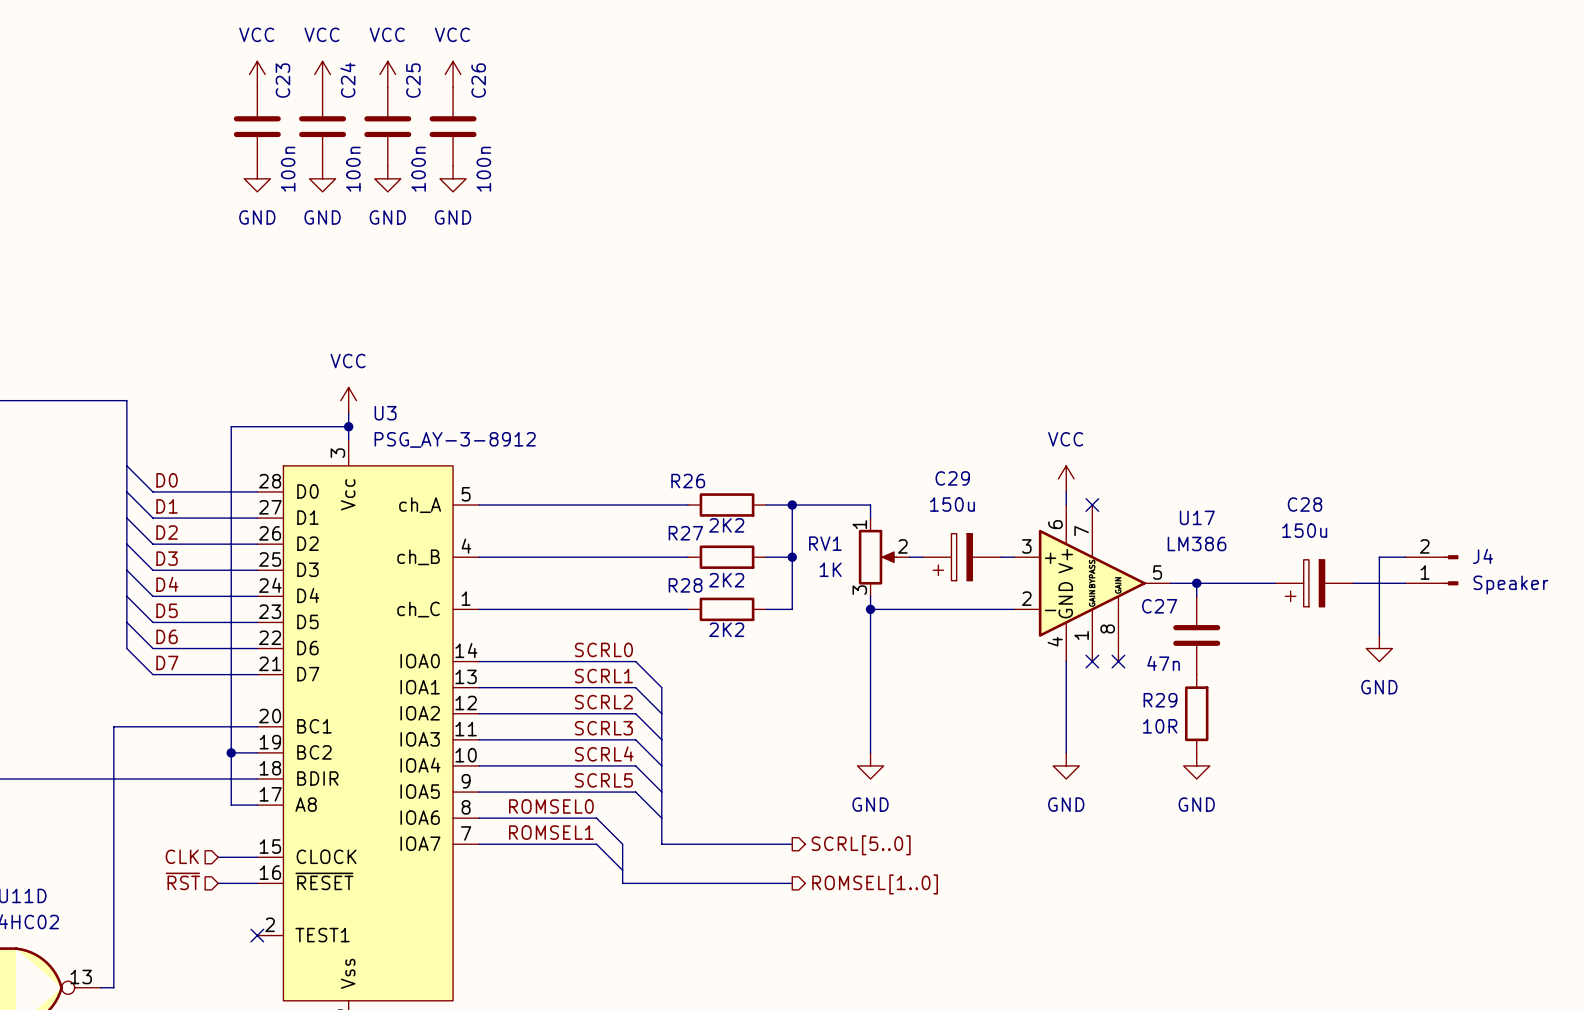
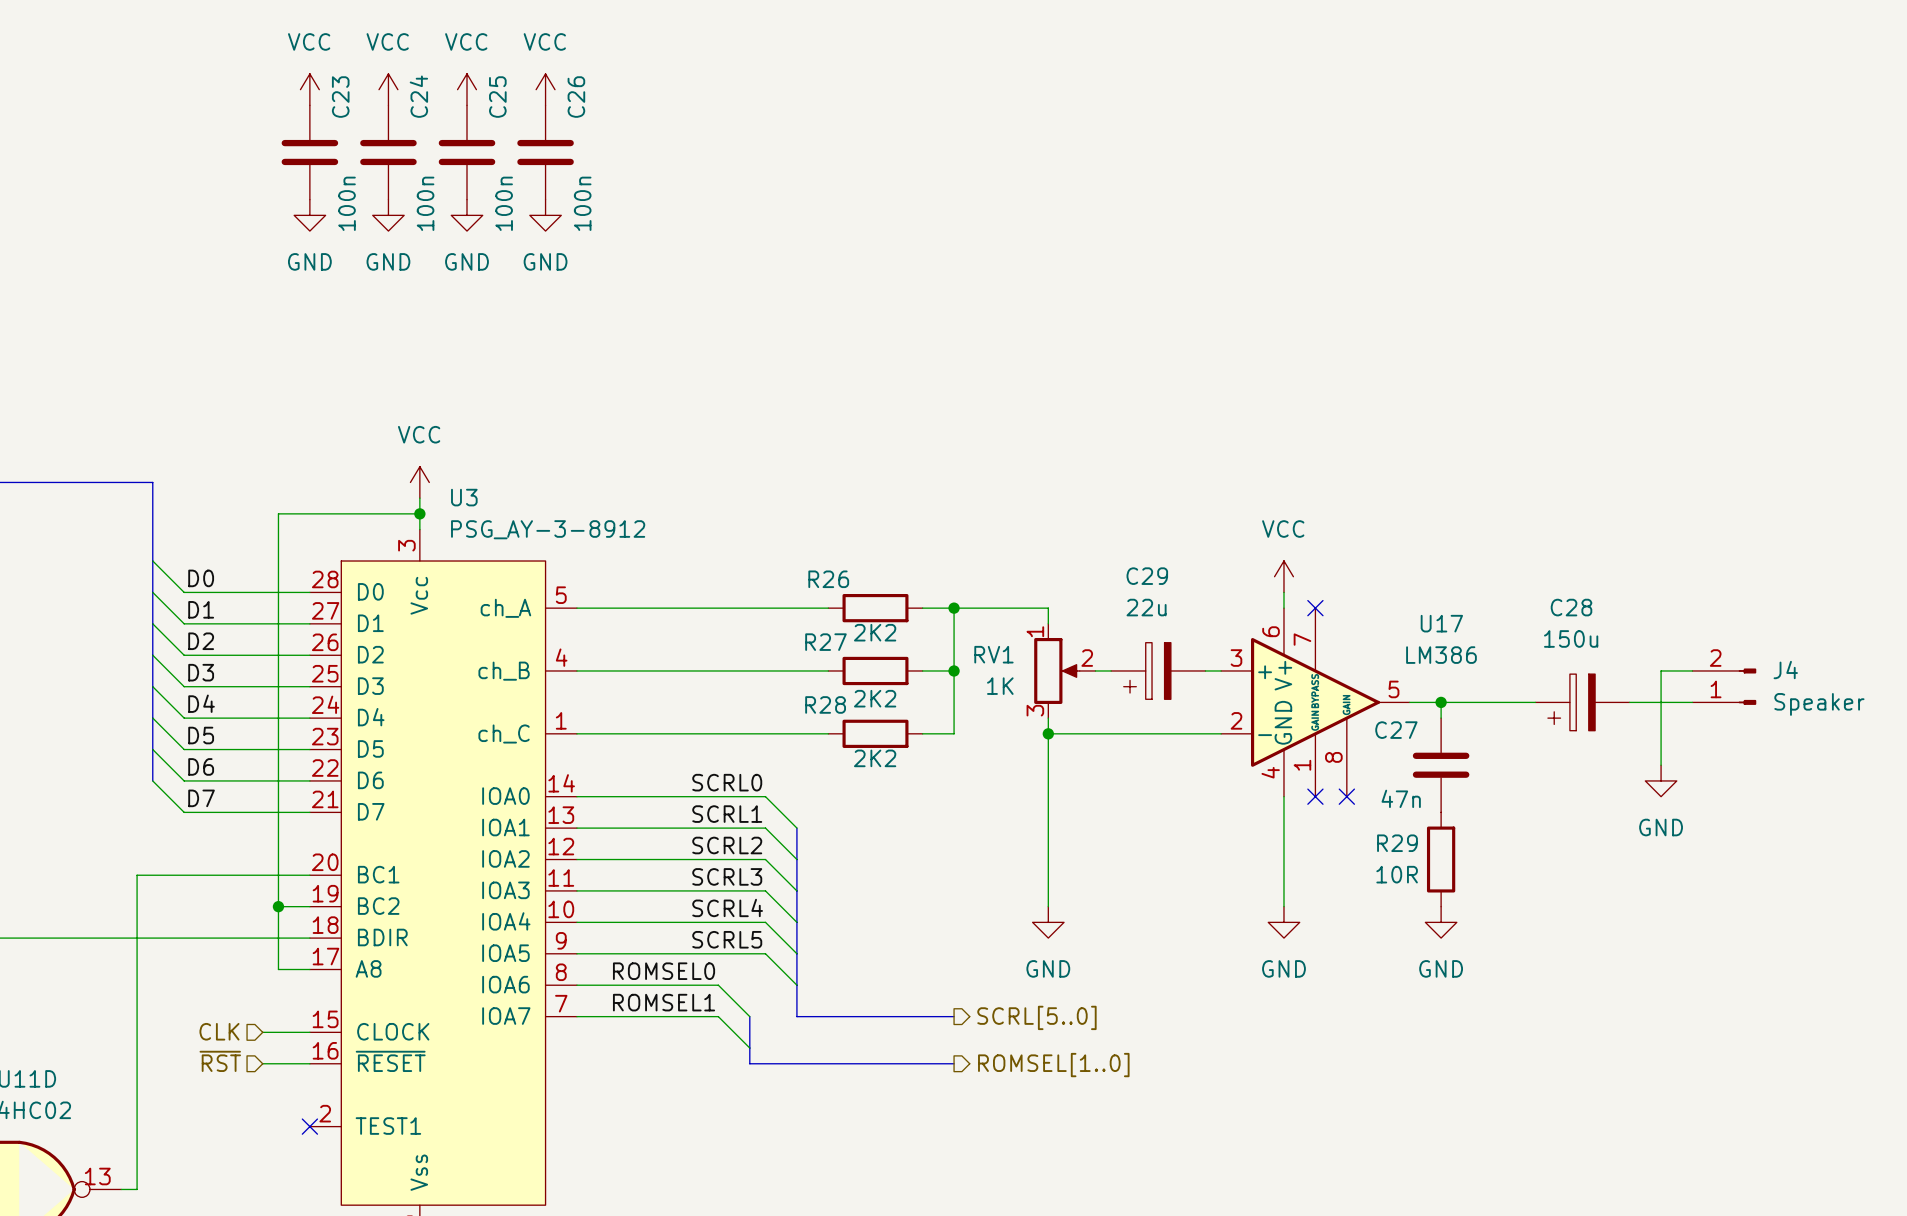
C29 value: 150u (952, 504) -> 22u (1146, 607)

